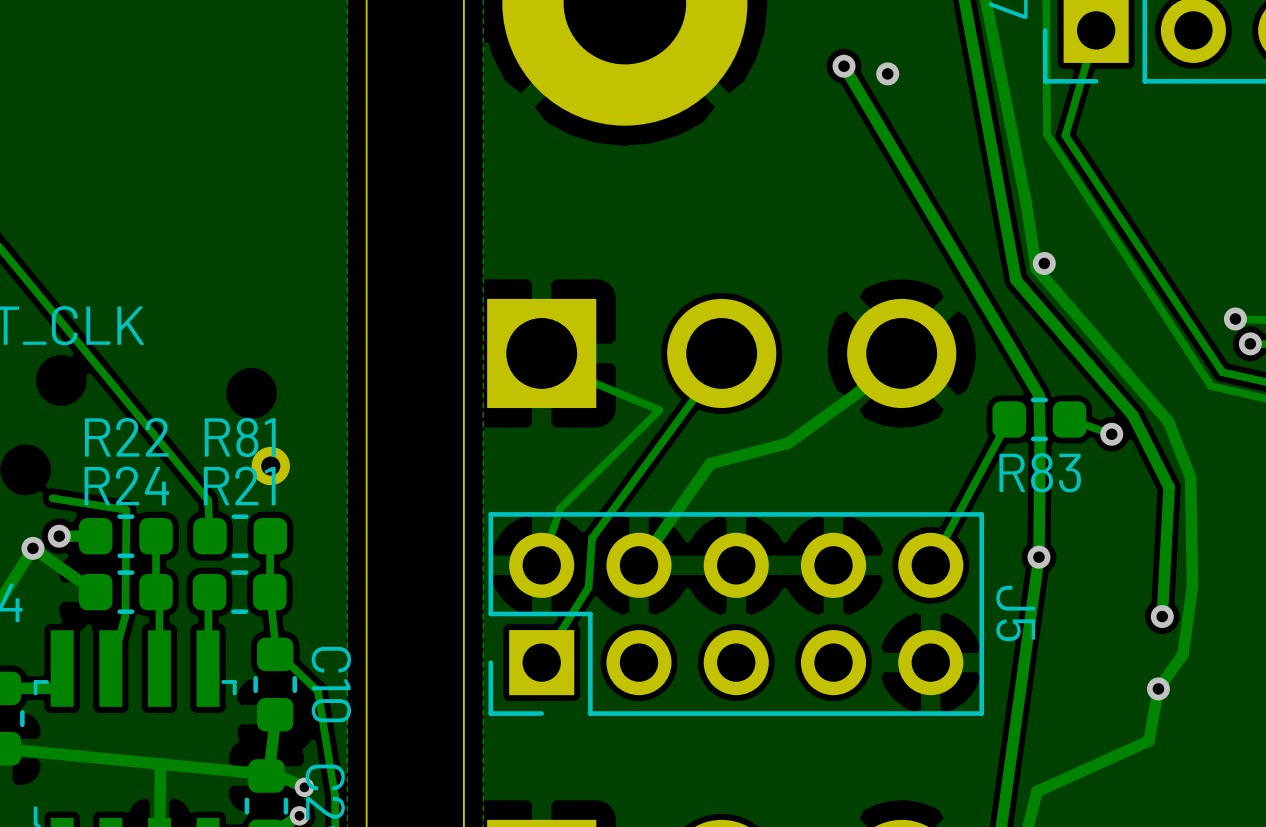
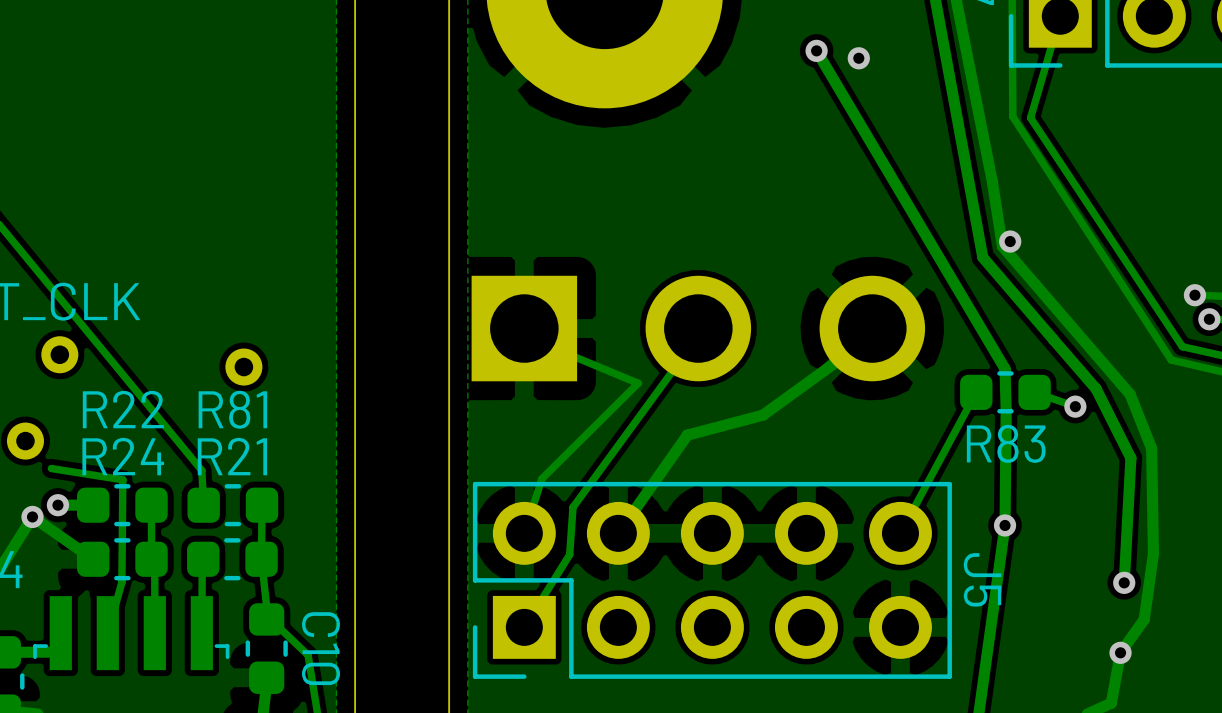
part: none -> (59, 354)
part position: (270, 466) -> (243, 367)
part: none -> (25, 441)

